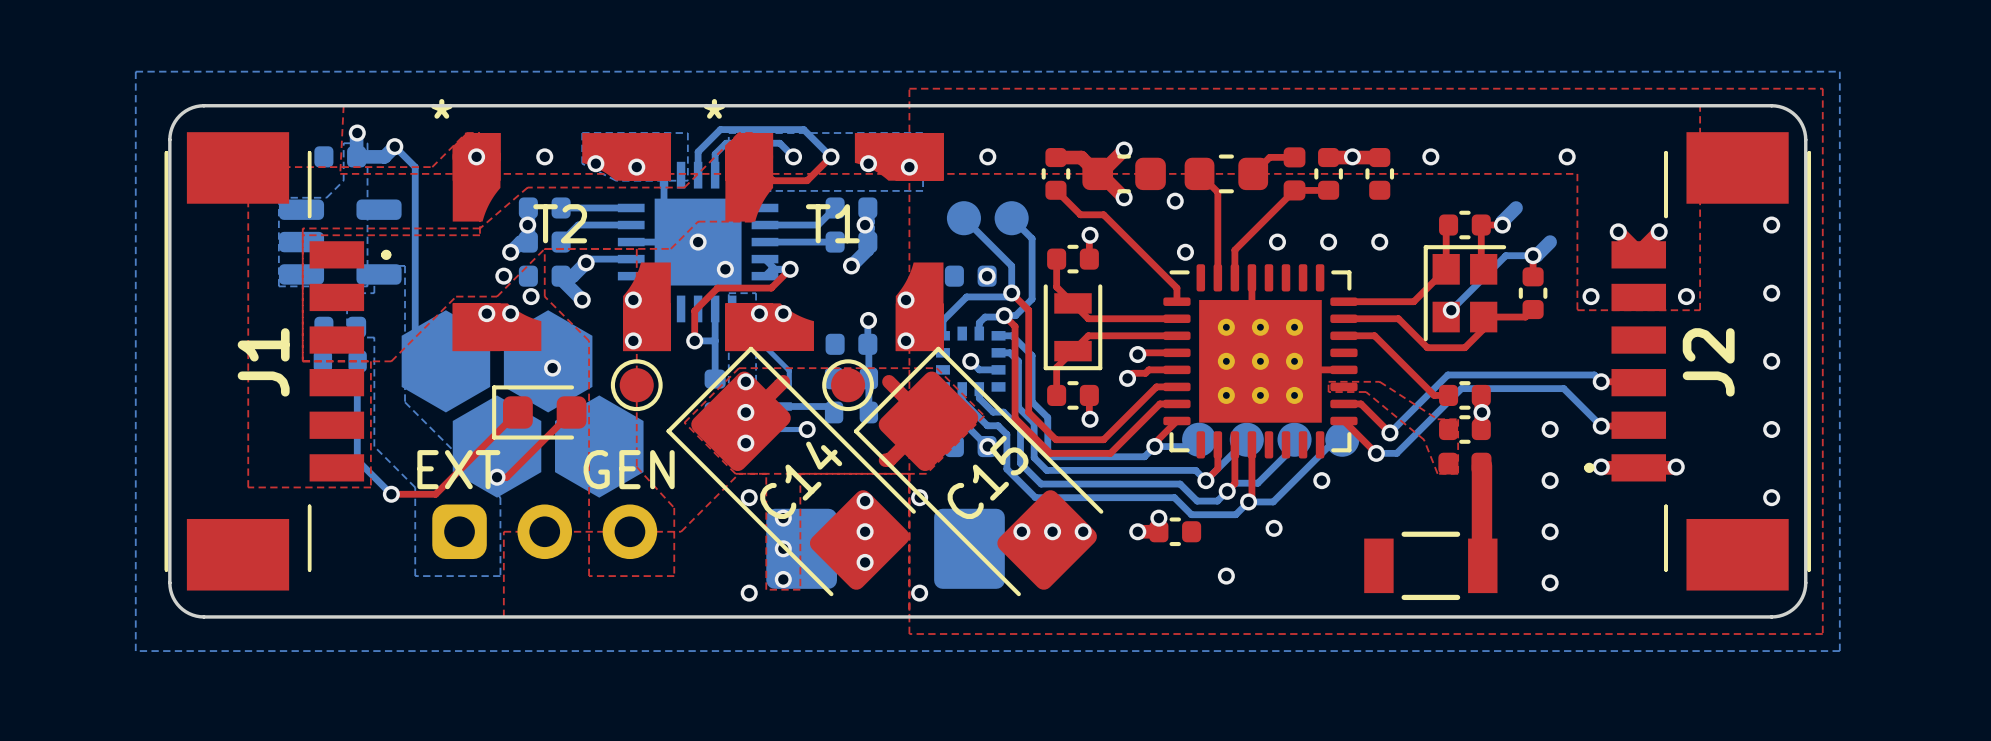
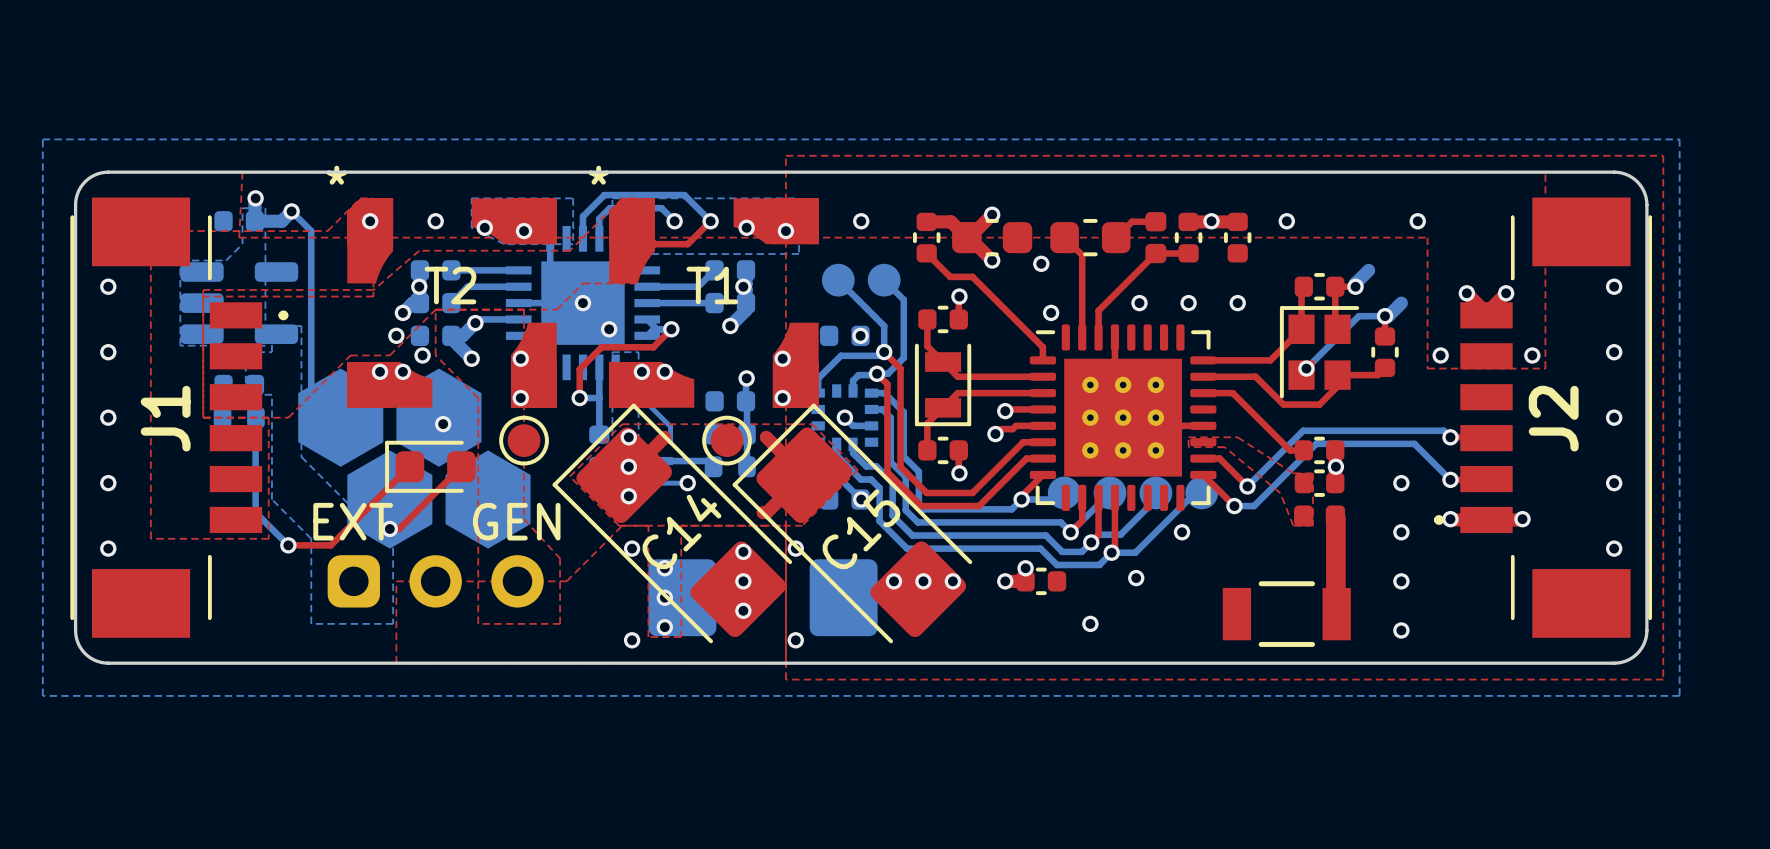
via: none -> (108, 286)
via: none -> (108, 352)
via: none -> (108, 417)
via: none -> (108, 483)
via: none -> (108, 548)

